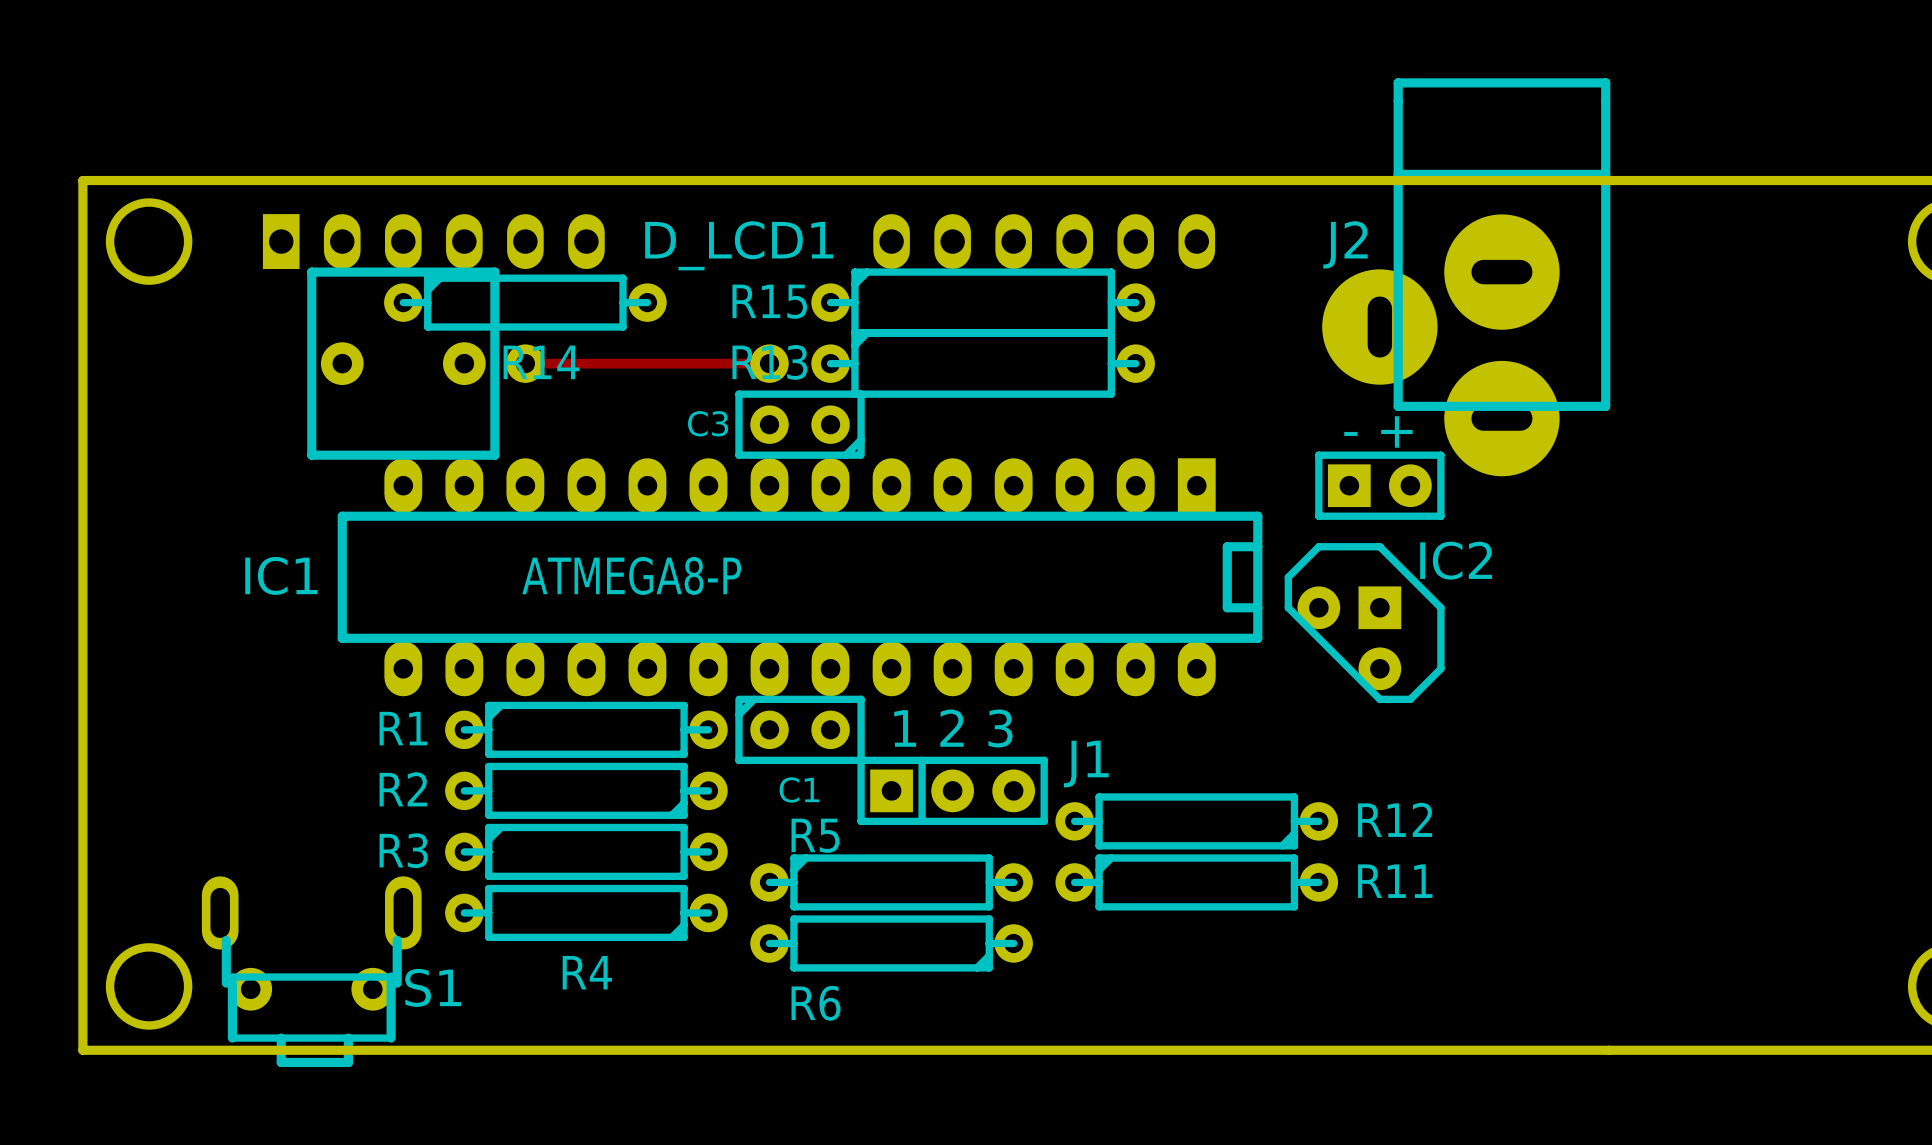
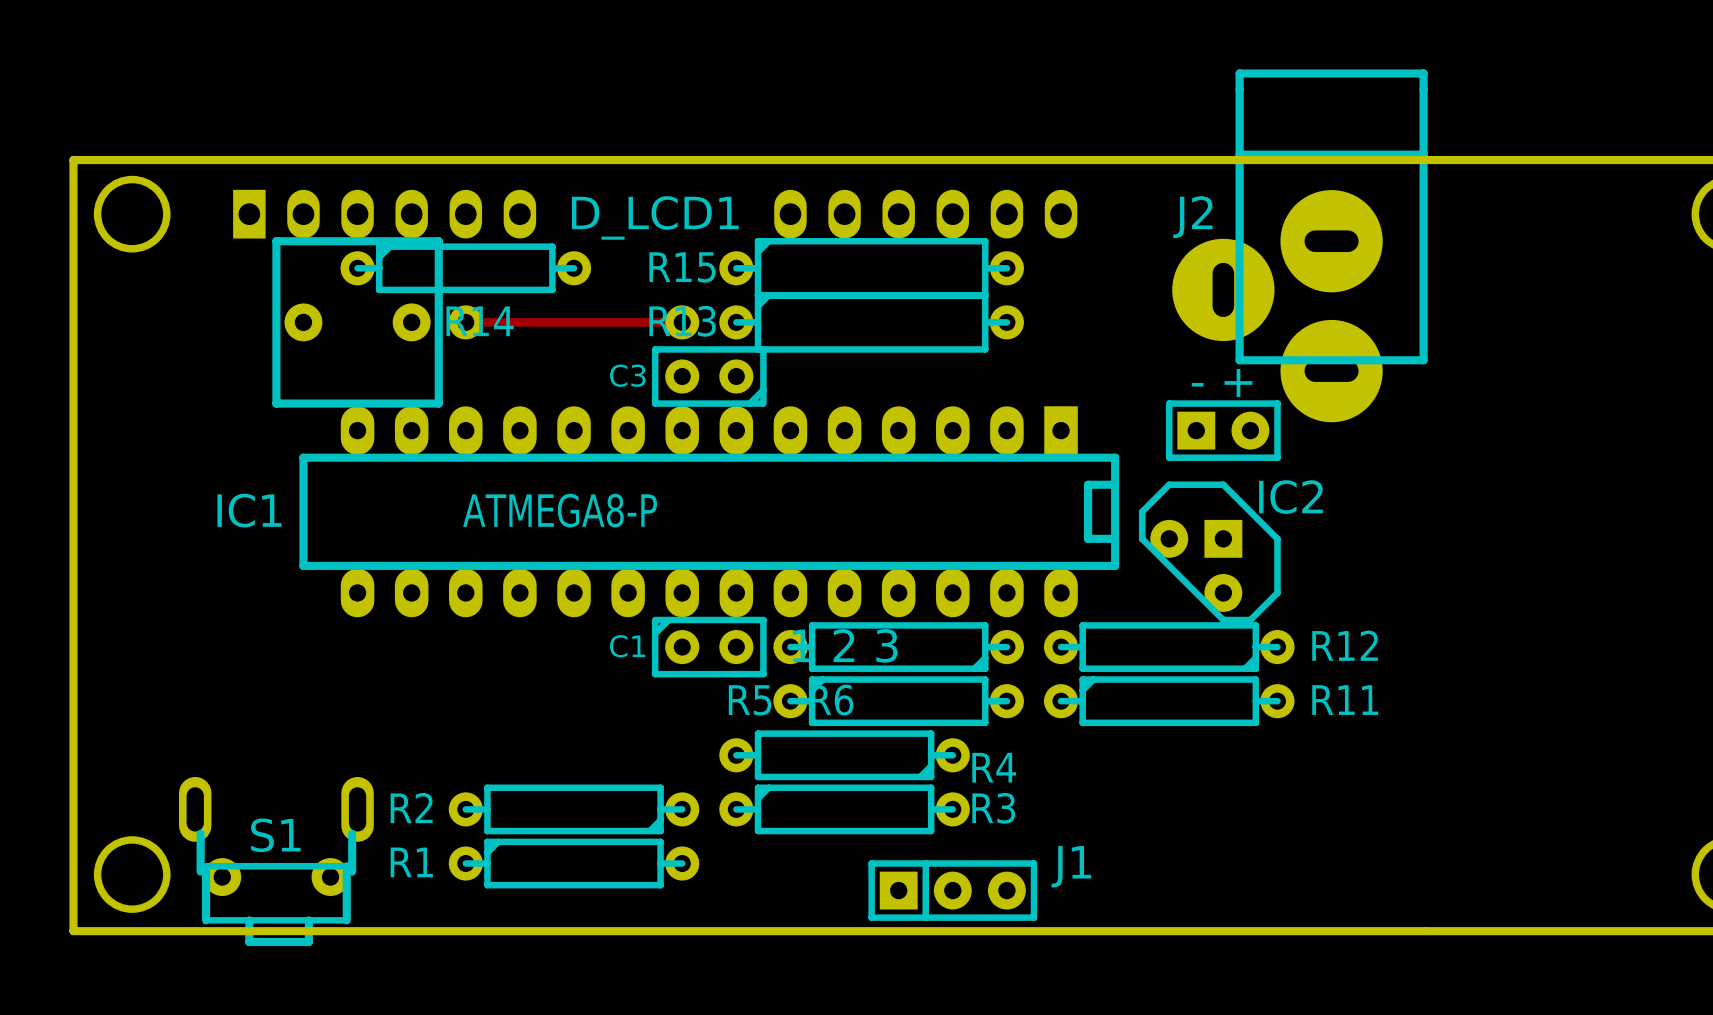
R1 position: (586, 729) -> (574, 863)
C1 name position: C1 (799, 789) -> C1 (627, 646)
R2 position: (586, 790) -> (574, 809)
J1 position: (952, 790) -> (952, 890)
R11 position: (1196, 821) -> (1169, 647)
R5 name position: R5 (815, 835) -> R5 (750, 700)
R3 name position: R3 (403, 850) -> R3 (993, 808)
R3 position: (586, 851) -> (844, 809)
R5 position: (891, 882) -> (898, 701)
R12 position: (1196, 882) -> (1169, 701)
R4 position: (586, 912) -> (844, 755)
R6 position: (891, 943) -> (898, 647)
R4 name position: R4 (587, 972) -> R4 (994, 767)
S1 name position: S1 (433, 987) -> S1 (275, 835)

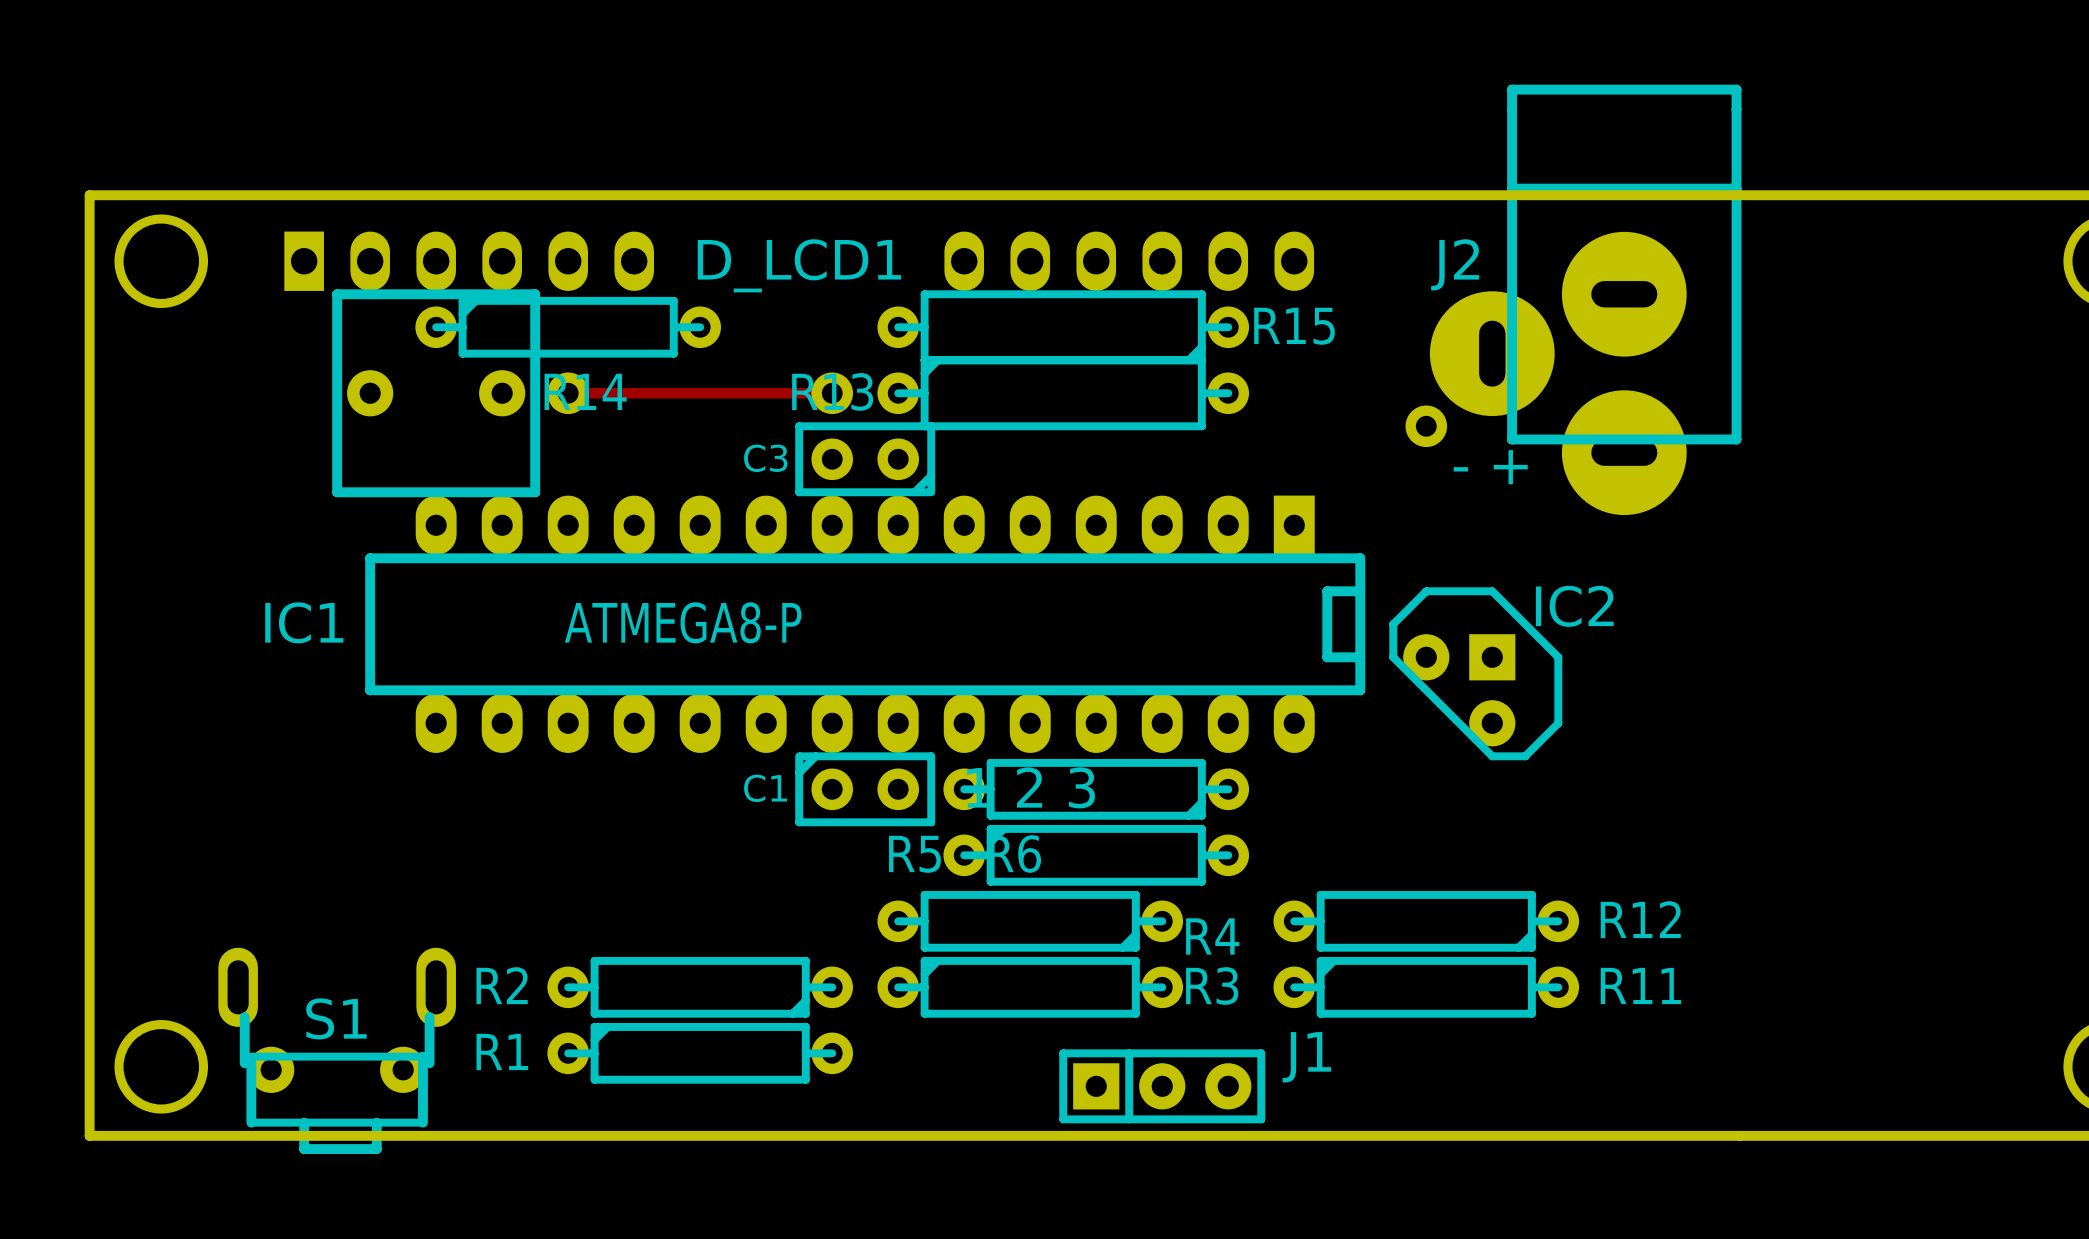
R15 rotation: 0° (871, 268) -> 180° (1063, 327)
part: none -> (1426, 426)
part: (1223, 430) -> none
R11 position: (1169, 647) -> (1426, 921)
R12 position: (1169, 701) -> (1426, 987)

